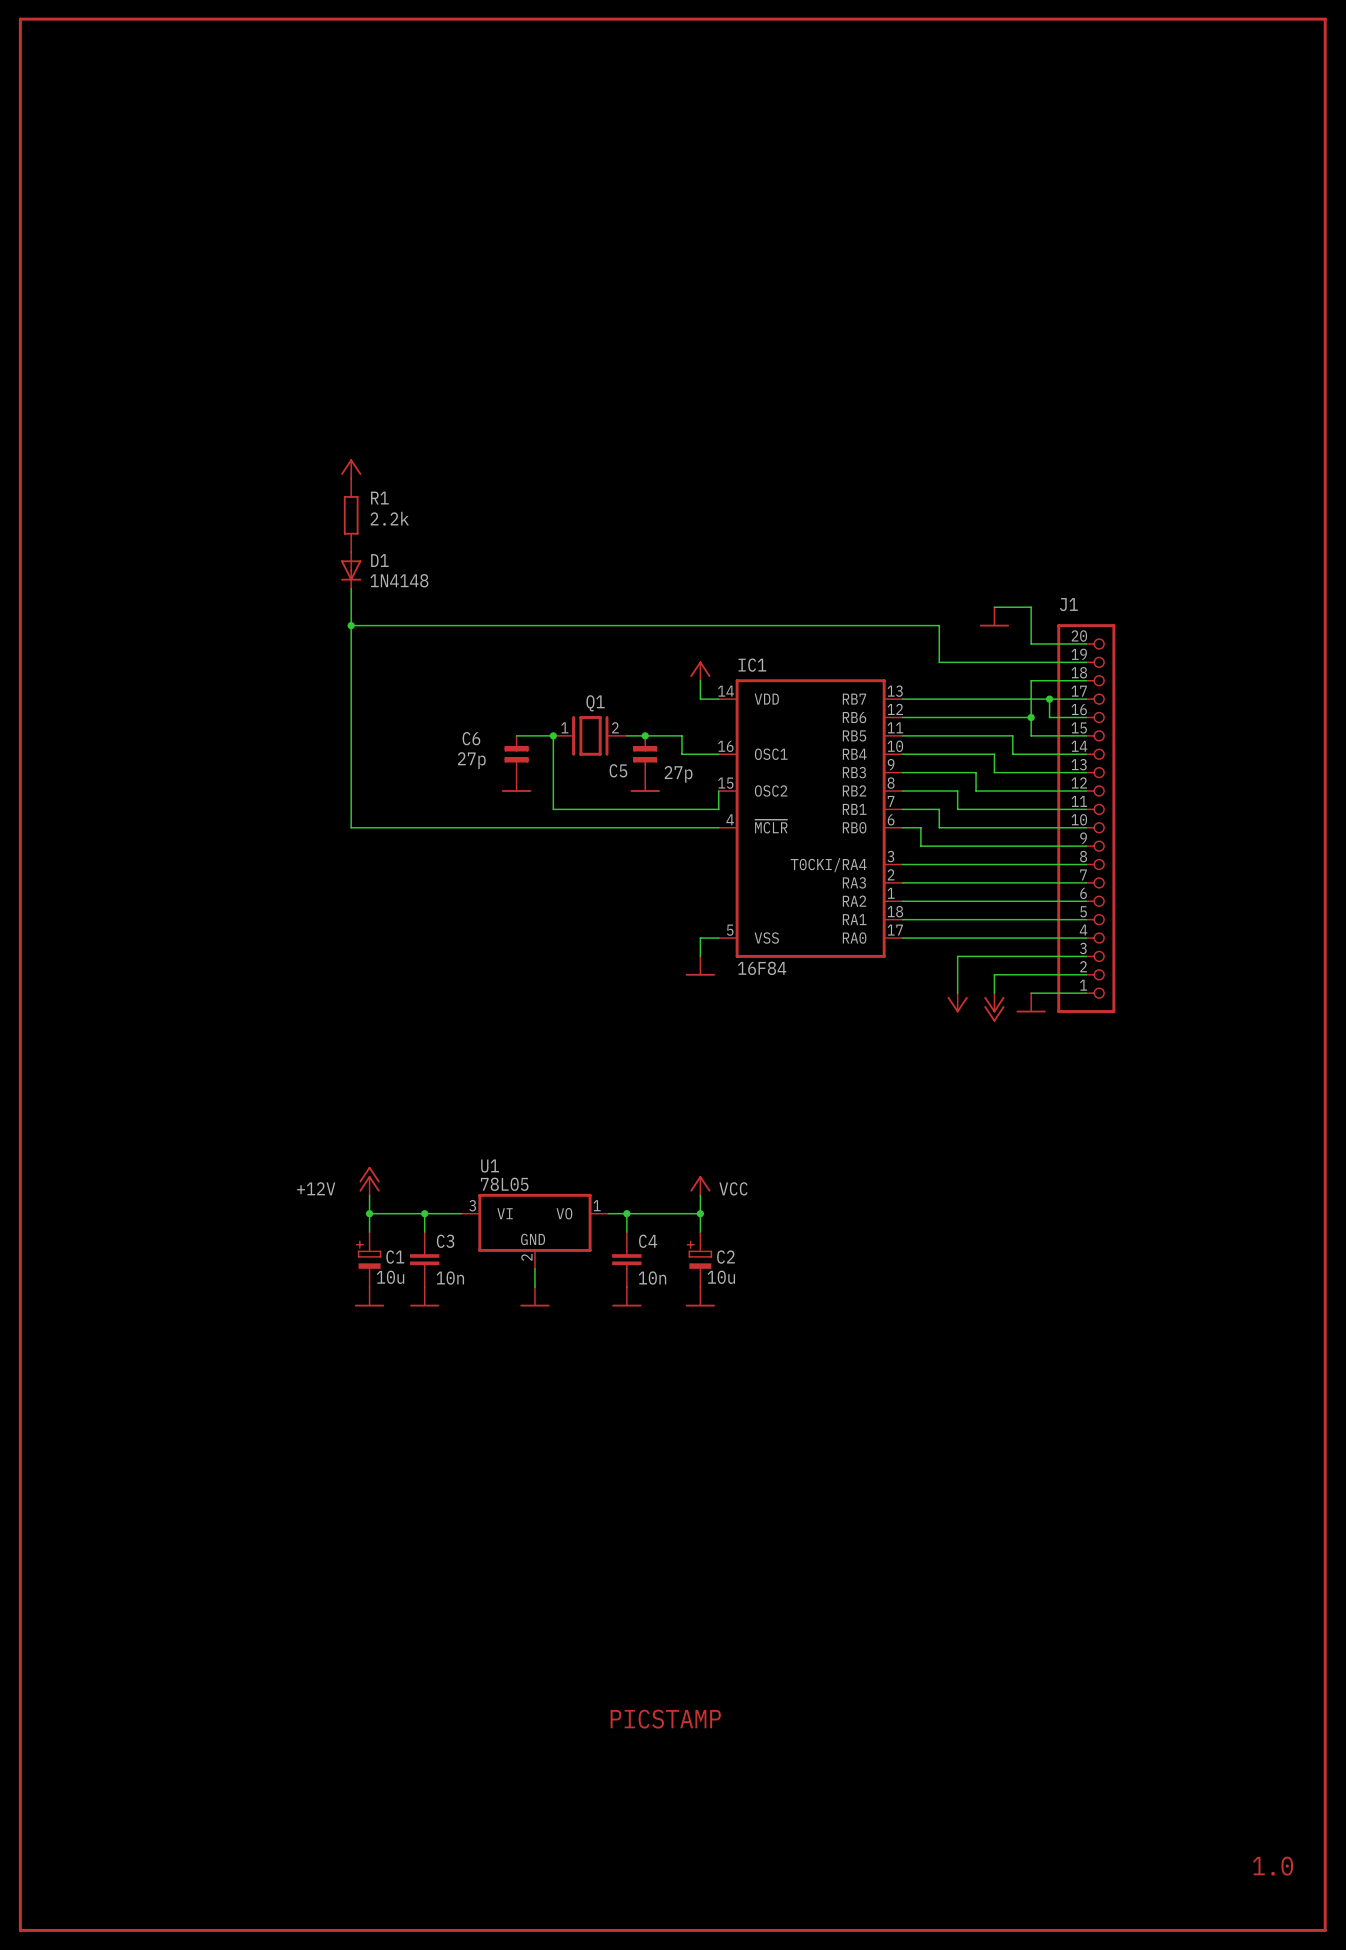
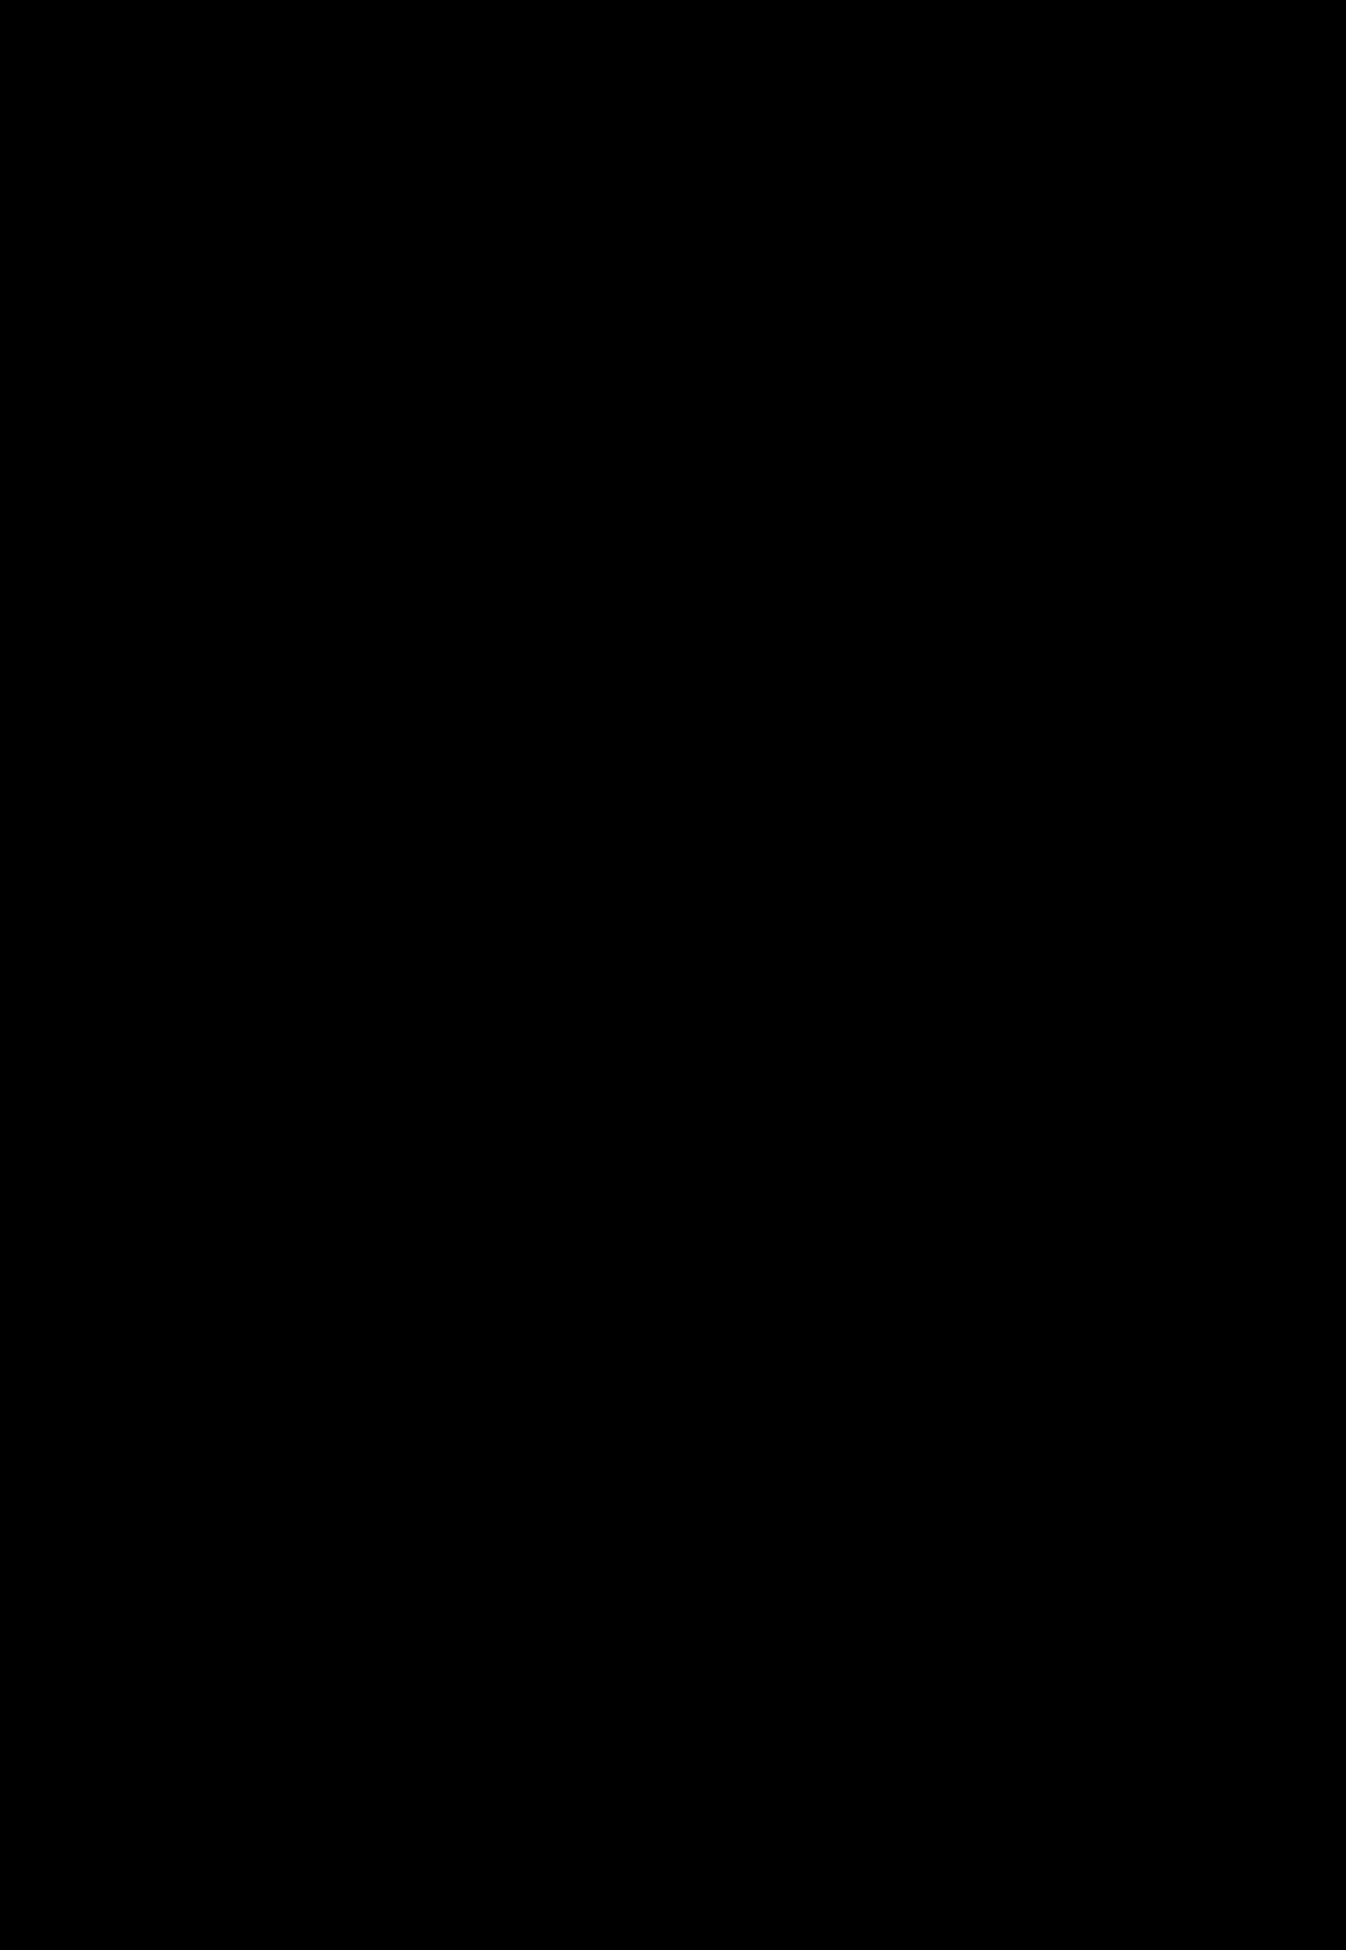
power symbol: (351, 468) -> none
R1: 2.2k (351, 515) -> none
D1: 1N4148 (351, 570) -> none
wire: (351, 588) (351, 827) (718, 827) -> none
wire: (994, 607) (1031, 607) (1031, 643) (1086, 643) -> none
power symbol: (994, 616) -> none
wire: (351, 625) (939, 625) (939, 662) (1086, 662) -> none
junction: (351, 625) -> none
power symbol: (700, 671) -> none
wire: (700, 680) (700, 699) (718, 699) -> none
wire: (1086, 680) (1031, 680) (1031, 735) (1086, 735) -> none
wire: (902, 699) (1086, 699) -> none
wire: (1049, 699) (1049, 717) (1086, 717) -> none
junction: (1049, 699) -> none
wire: (902, 717) (1031, 717) -> none
junction: (1031, 717) -> none
wire: (516, 735) (553, 735) (553, 809) (718, 809) (718, 791) -> none
junction: (553, 735) -> none
Q1: (590, 735) -> none
wire: (626, 735) (681, 735) (681, 754) (718, 754) -> none
junction: (645, 735) -> none
wire: (902, 735) (1012, 735) (1012, 754) (1086, 754) -> none
C6: 27p (516, 754) -> none
C5: 27p (645, 754) -> none
wire: (902, 754) (994, 754) (994, 772) (1086, 772) -> none
wire: (902, 772) (976, 772) (976, 791) (1086, 791) -> none
power symbol: (516, 782) -> none
power symbol: (645, 782) -> none
wire: (902, 791) (957, 791) (957, 809) (1086, 809) -> none
wire: (902, 809) (939, 809) (939, 827) (1086, 827) -> none
IC1: 16F84 (810, 818) -> none
J1: (1086, 818) -> none
wire: (902, 827) (920, 827) (920, 846) (1086, 846) -> none
wire: (902, 864) (1086, 864) -> none
wire: (902, 882) (1086, 882) -> none
wire: (902, 901) (1086, 901) -> none
wire: (902, 919) (1086, 919) -> none
wire: (718, 938) (700, 938) (700, 956) -> none
wire: (902, 938) (1086, 938) -> none
wire: (1086, 956) (957, 956) (957, 993) -> none
power symbol: (700, 966) -> none
part: (672, 974) -> none
wire: (1086, 974) (994, 974) (994, 993) -> none
wire: (1031, 993) (1086, 993) -> none
power symbol: (957, 1002) -> none
power symbol: (1031, 1002) -> none
power symbol: (994, 1007) -> none
power symbol: (369, 1181) -> none
power symbol: (700, 1185) -> none
label: +12V (316, 1188) -> none
label: VCC (733, 1188) -> none
wire: (369, 1195) (369, 1232) -> none
wire: (700, 1195) (700, 1232) -> none
wire: (369, 1213) (461, 1213) -> none
junction: (369, 1213) -> none
wire: (424, 1213) (424, 1232) -> none
junction: (424, 1213) -> none
wire: (608, 1213) (700, 1213) -> none
wire: (626, 1213) (626, 1232) -> none
junction: (626, 1213) -> none
junction: (700, 1213) -> none
U1: 78L05 (534, 1231) -> none
C1: 10u (368, 1259) -> none
C3: 10n (424, 1259) -> none
C4: 10n (626, 1259) -> none
C2: 10u (699, 1259) -> none
wire: (534, 1268) (534, 1287) -> none
power symbol: (369, 1296) -> none
power symbol: (424, 1296) -> none
power symbol: (534, 1296) -> none
power symbol: (626, 1296) -> none
power symbol: (700, 1296) -> none
text: PICSTAMP (665, 1719) -> none
text: 1.0 (1273, 1866) -> none

